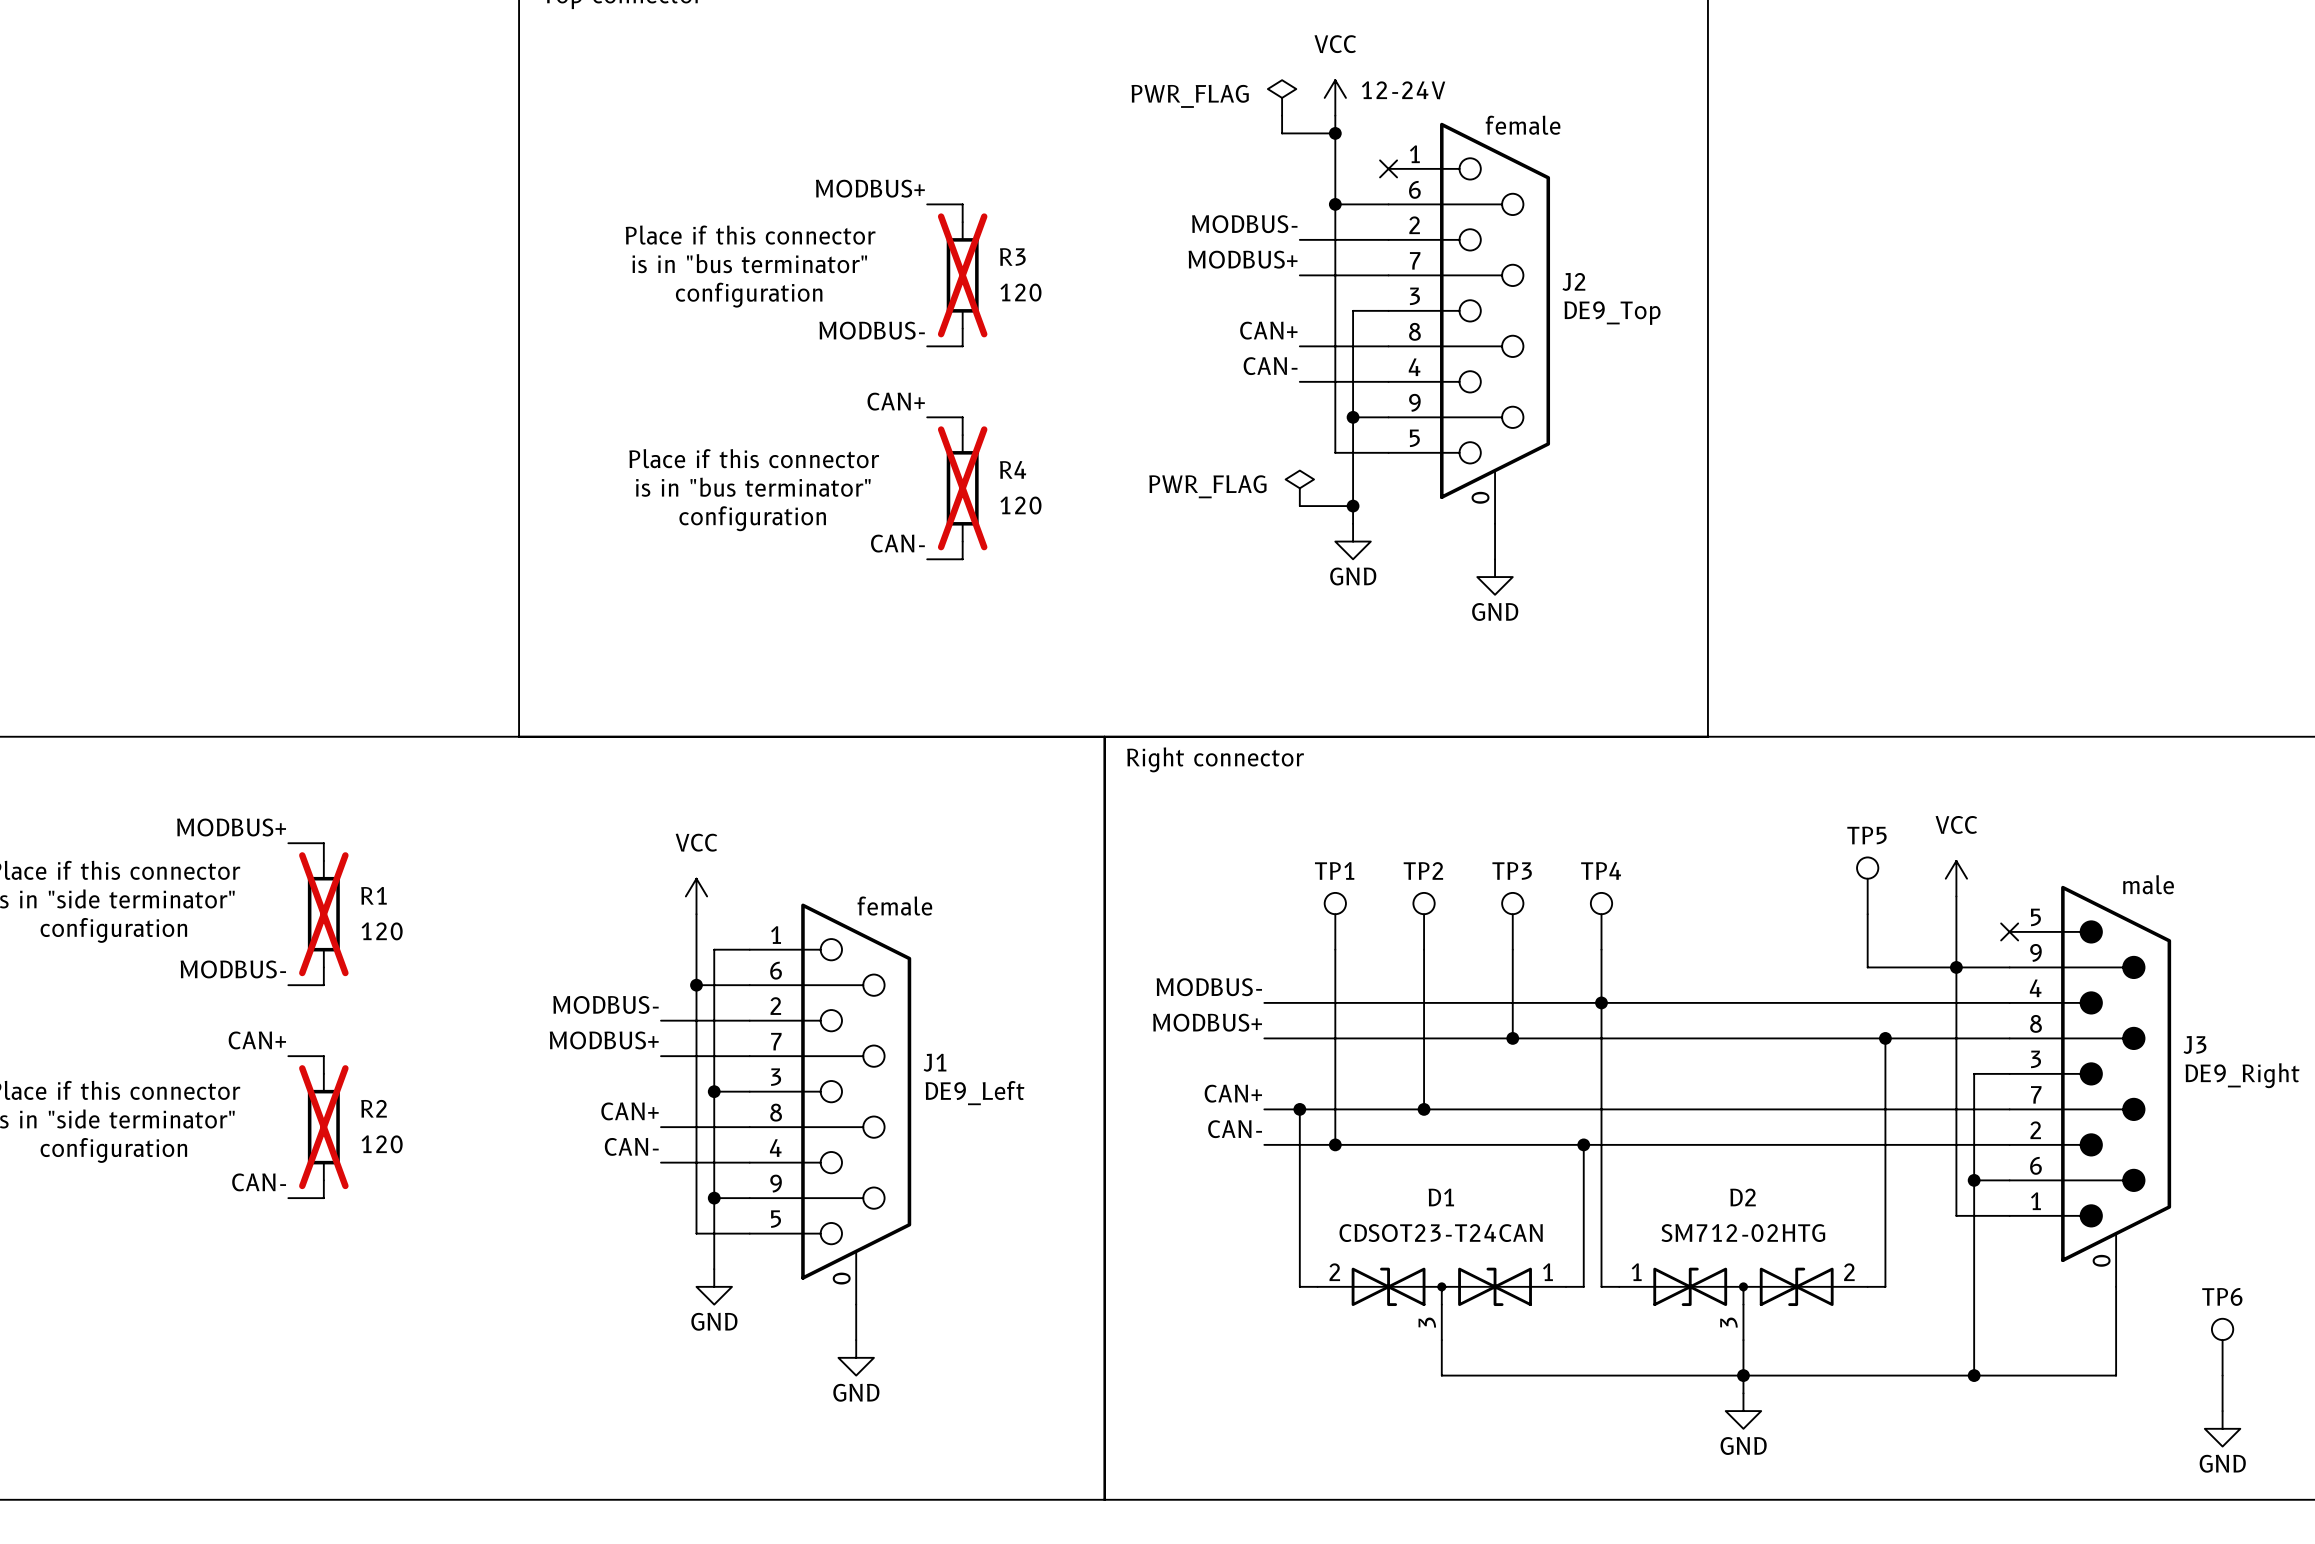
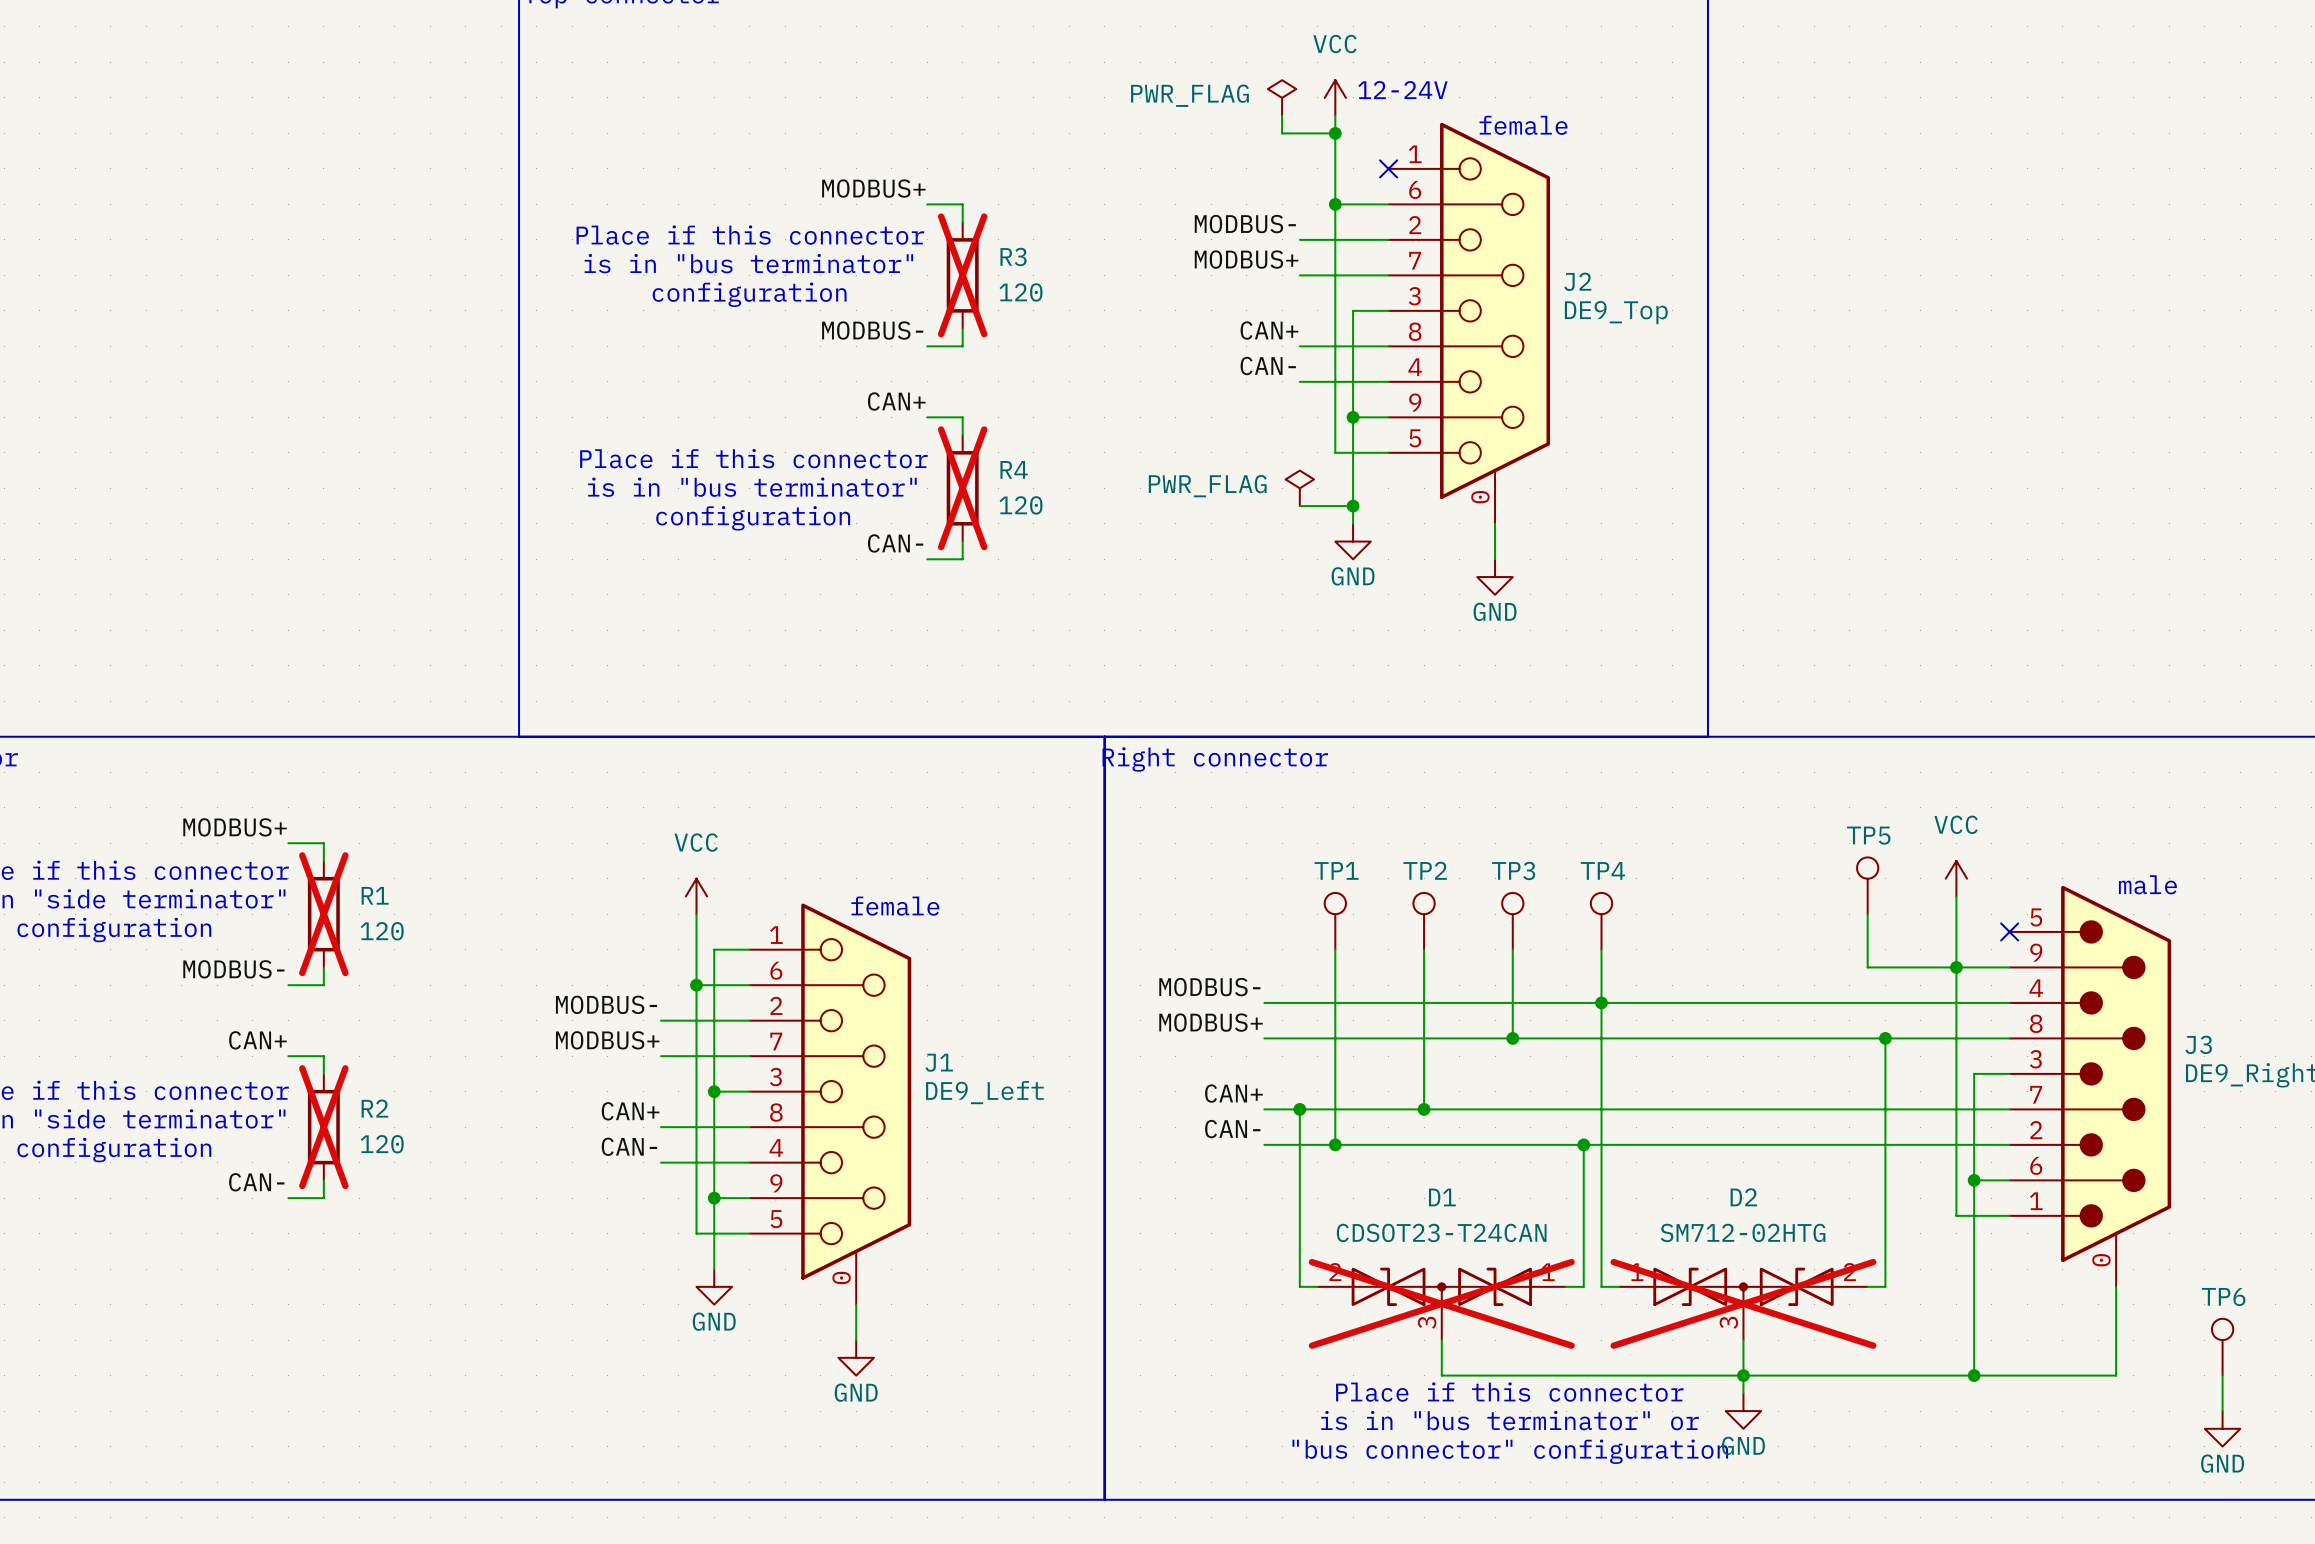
D1 do-not-place cross: none -> (1441, 1303)
D2 do-not-place cross: none -> (1743, 1303)
text: none -> Place if this connector (1509, 1392)
text: none -> is in "bus terminator" or (1510, 1420)
text: none -> "bus connector" configuration (1510, 1451)

